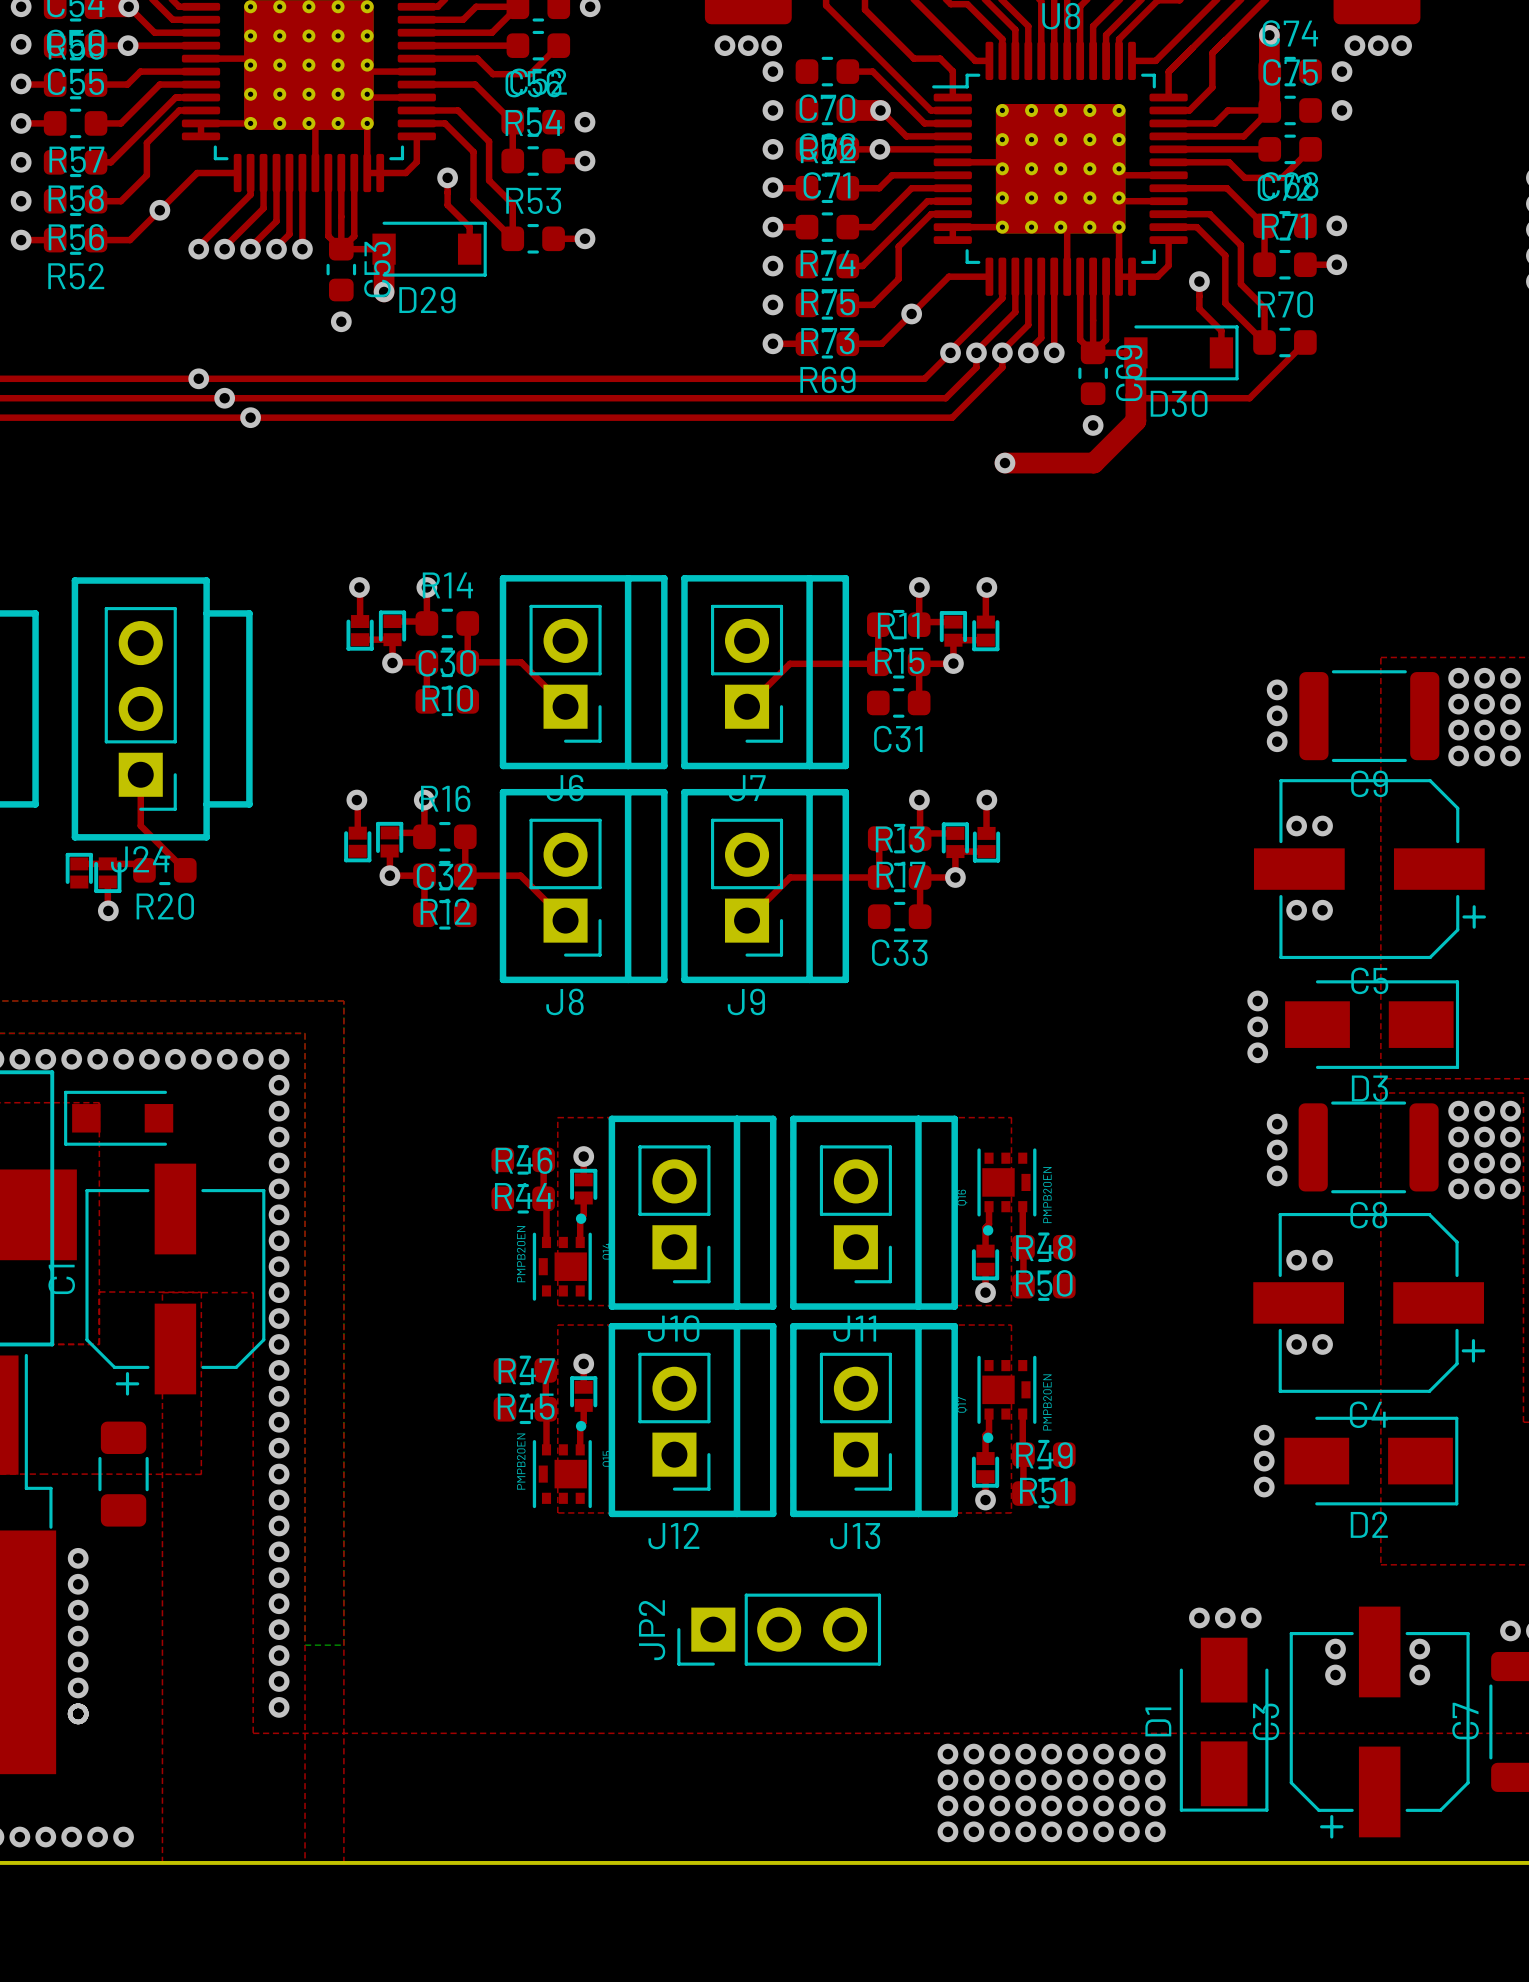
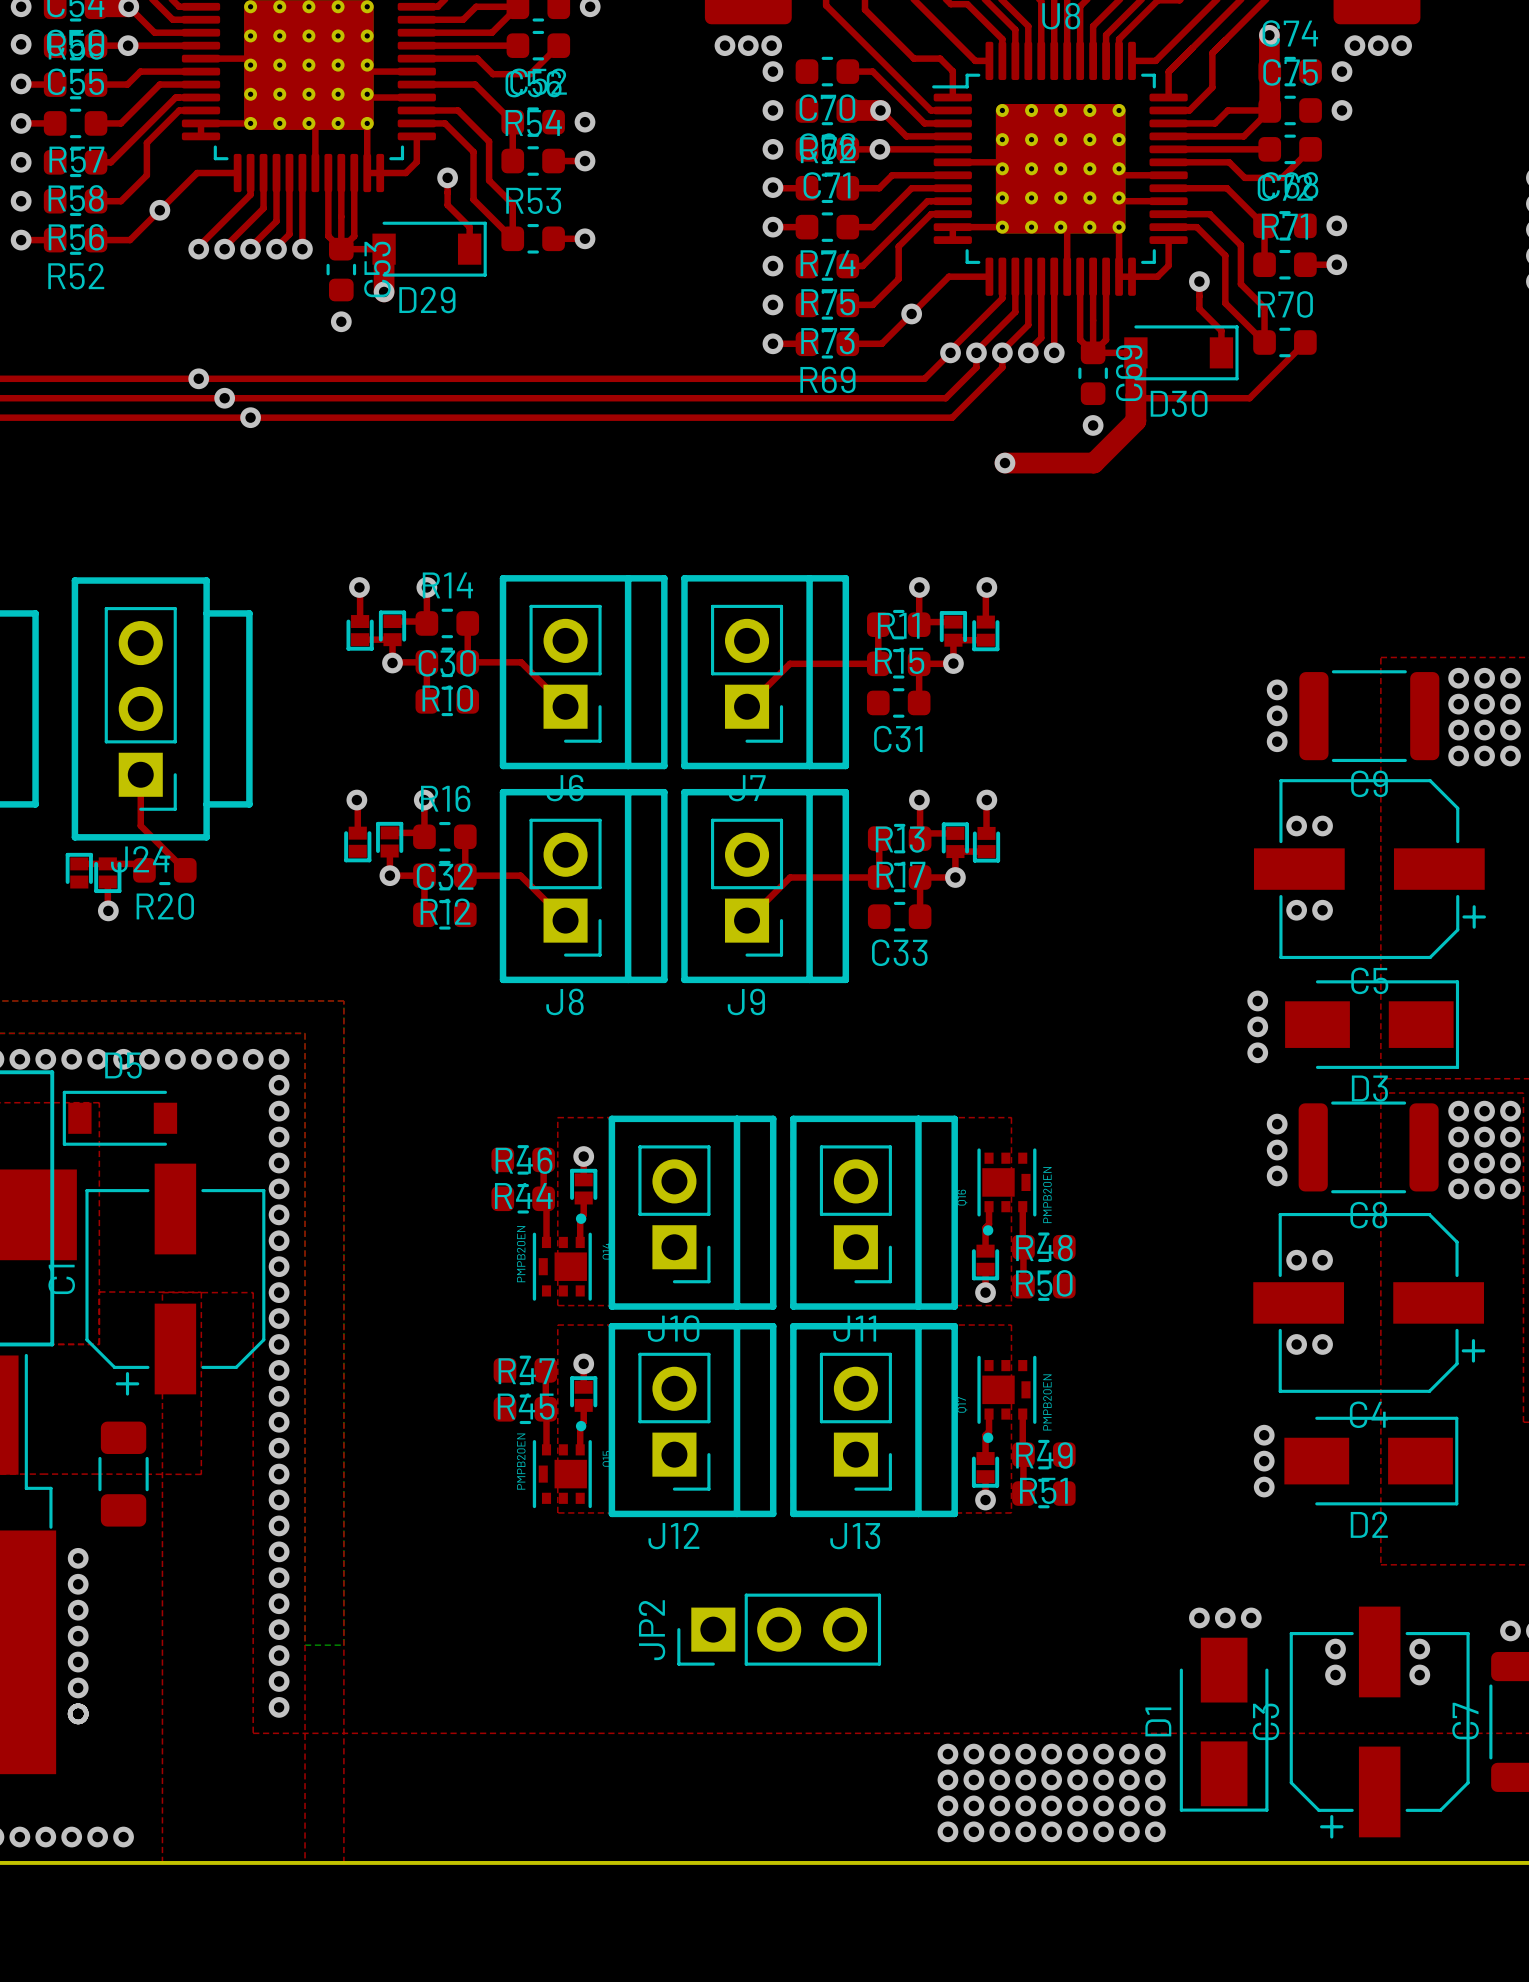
part: (118, 1118) -> none
D5: none -> (119, 1118)

